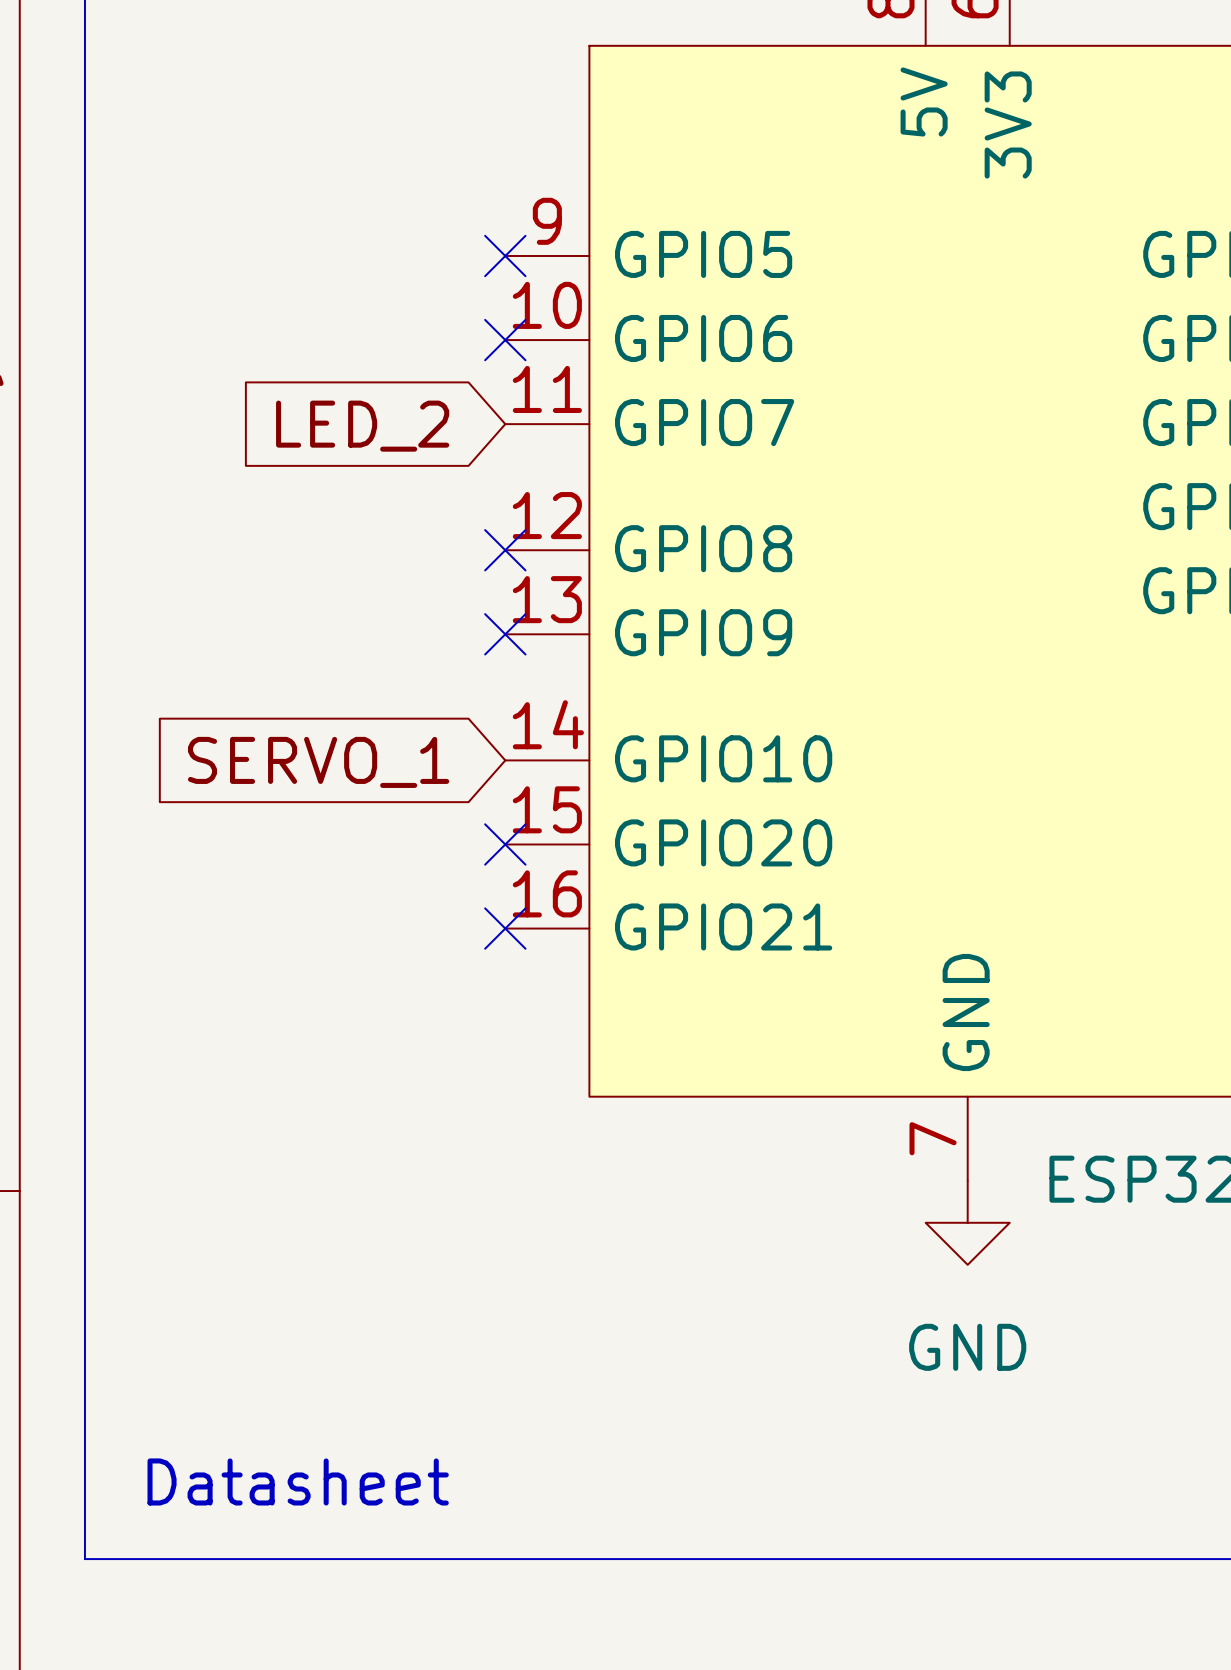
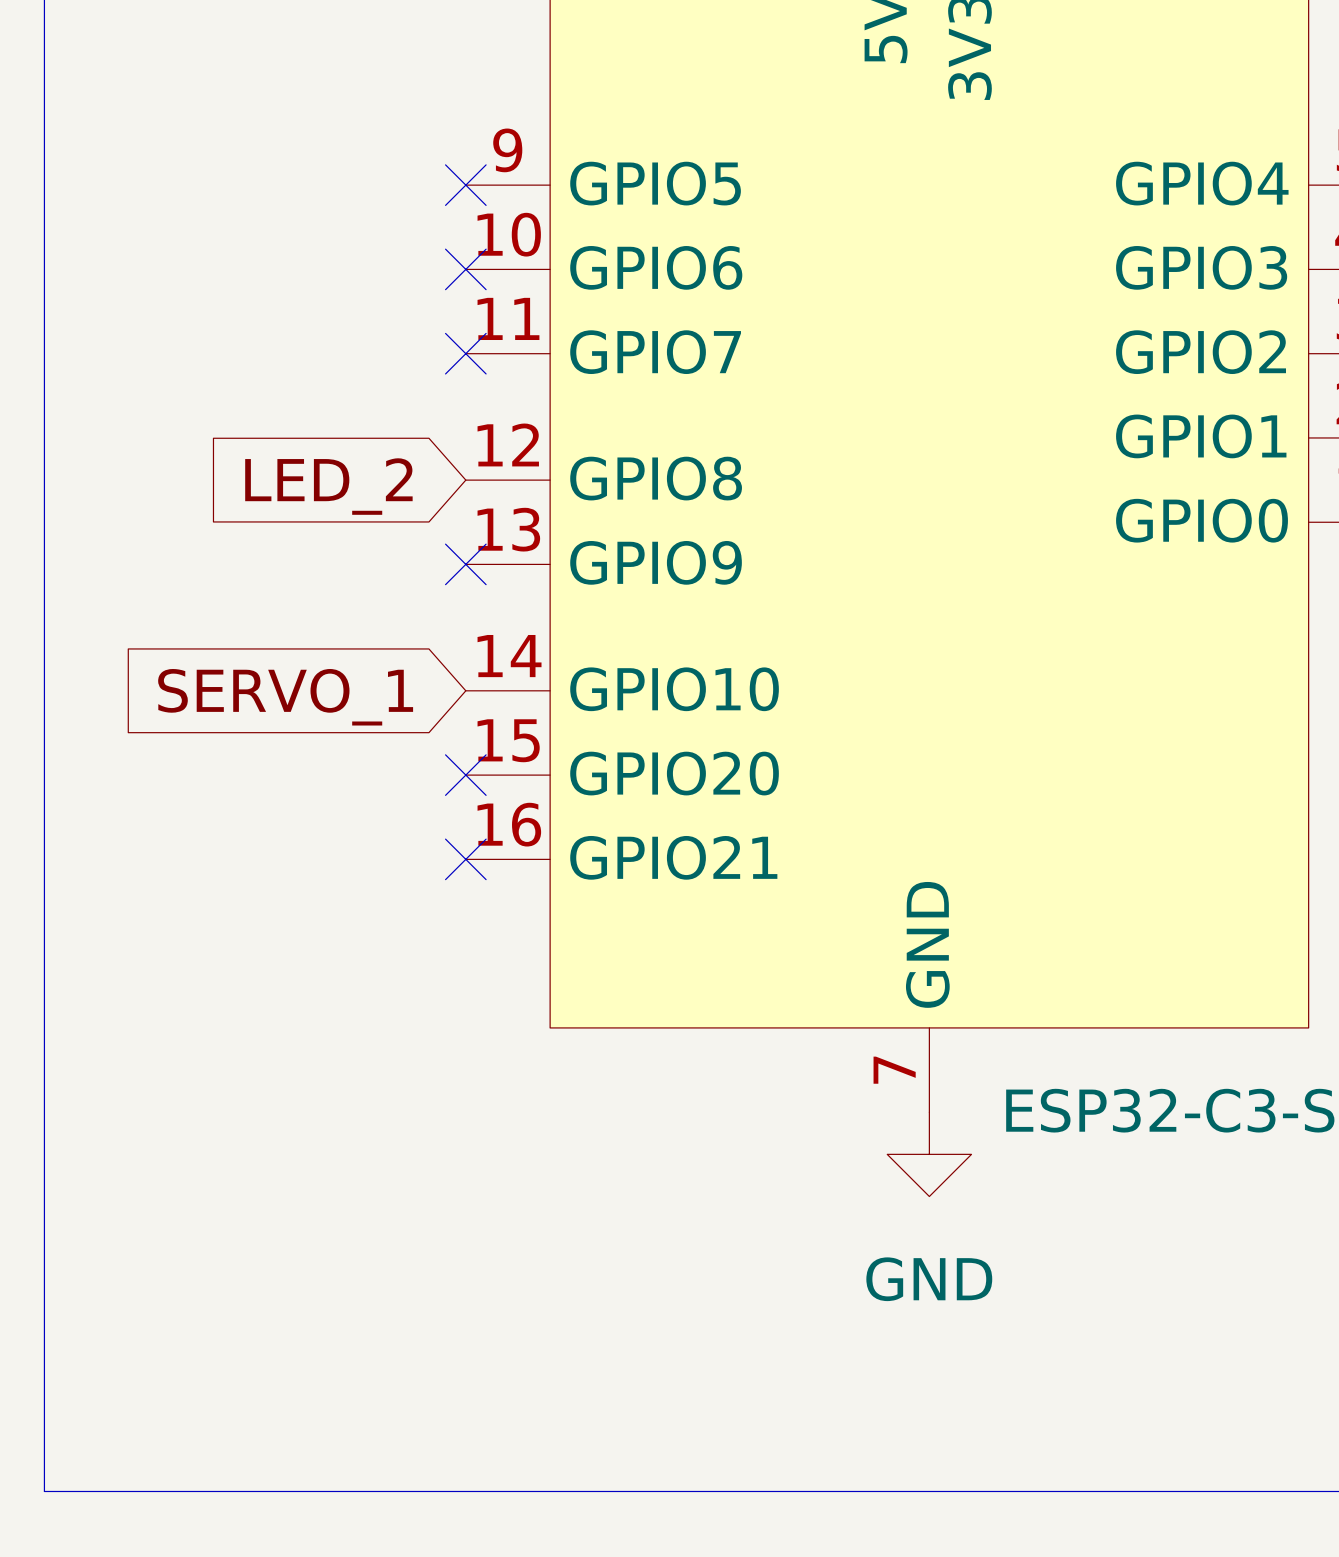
global label position: LED_2 (362, 426) -> LED_2 (328, 486)
no-connect mark position: (505, 550) -> (465, 353)
text: Datasheet (298, 1481) -> none

